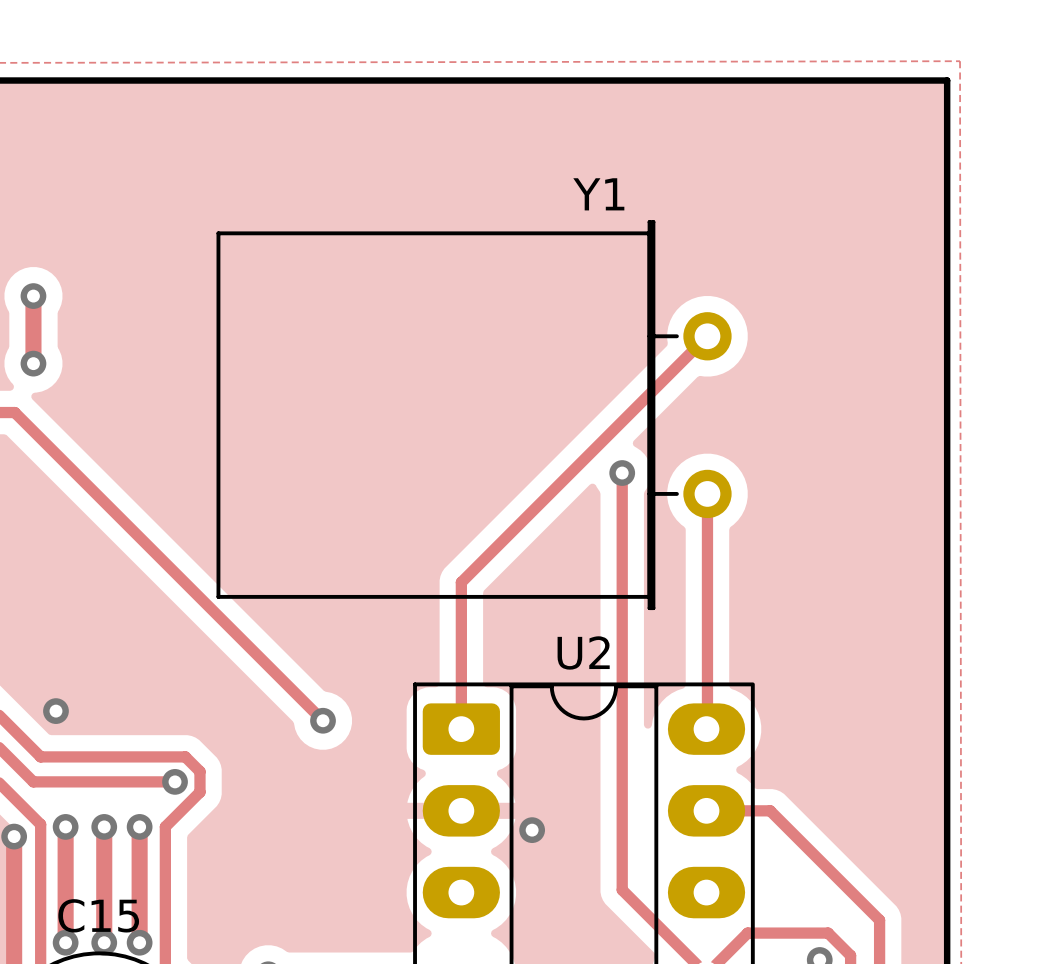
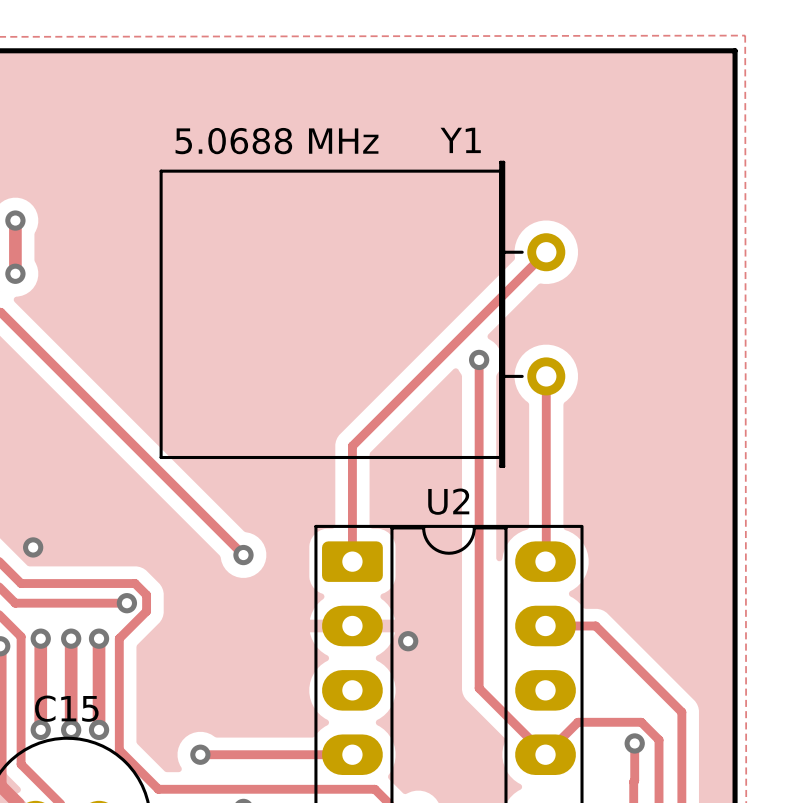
Y1 value: none -> 5.0688 MHz (277, 141)

